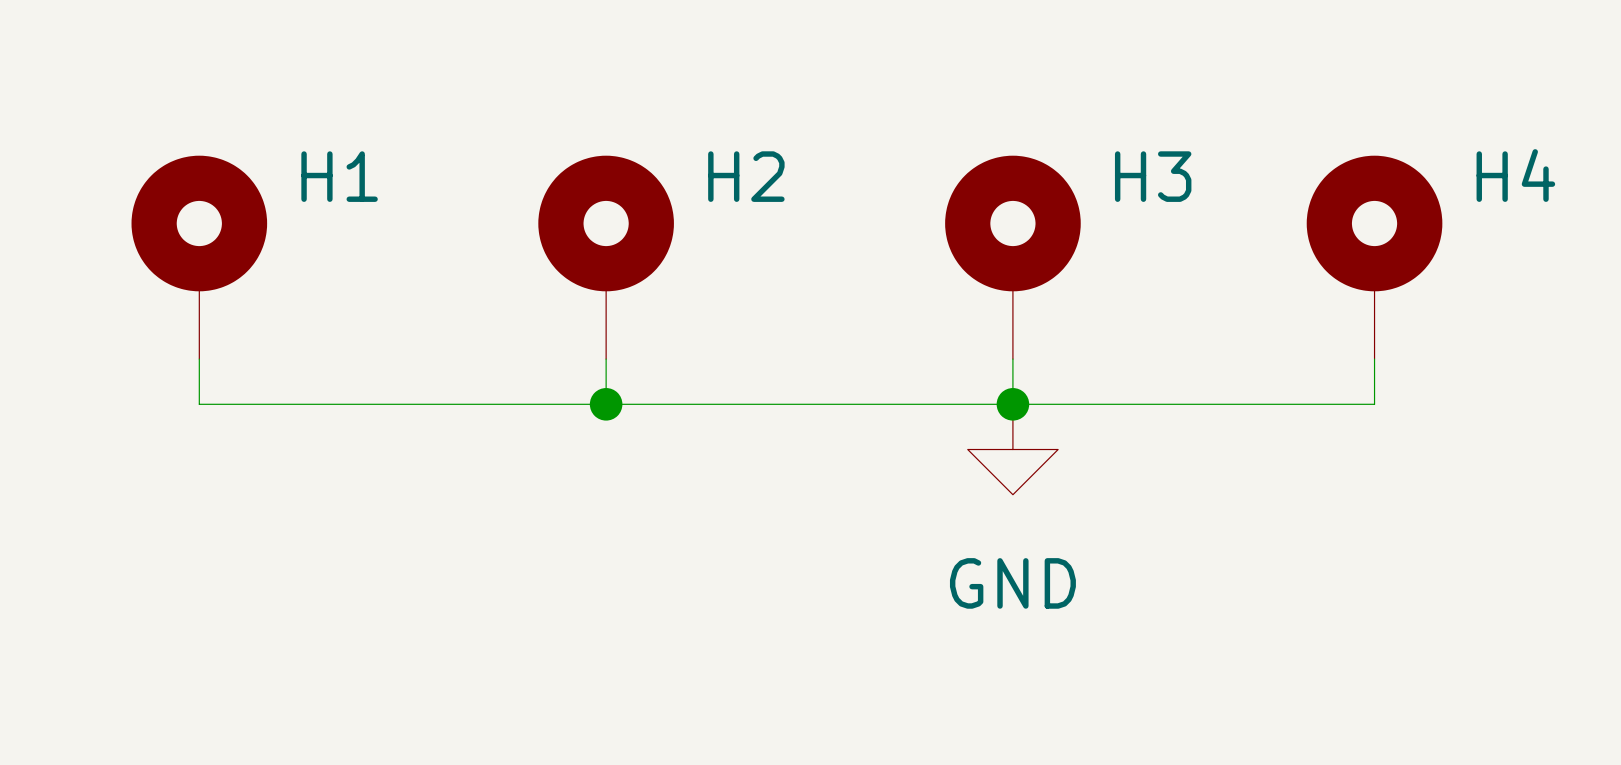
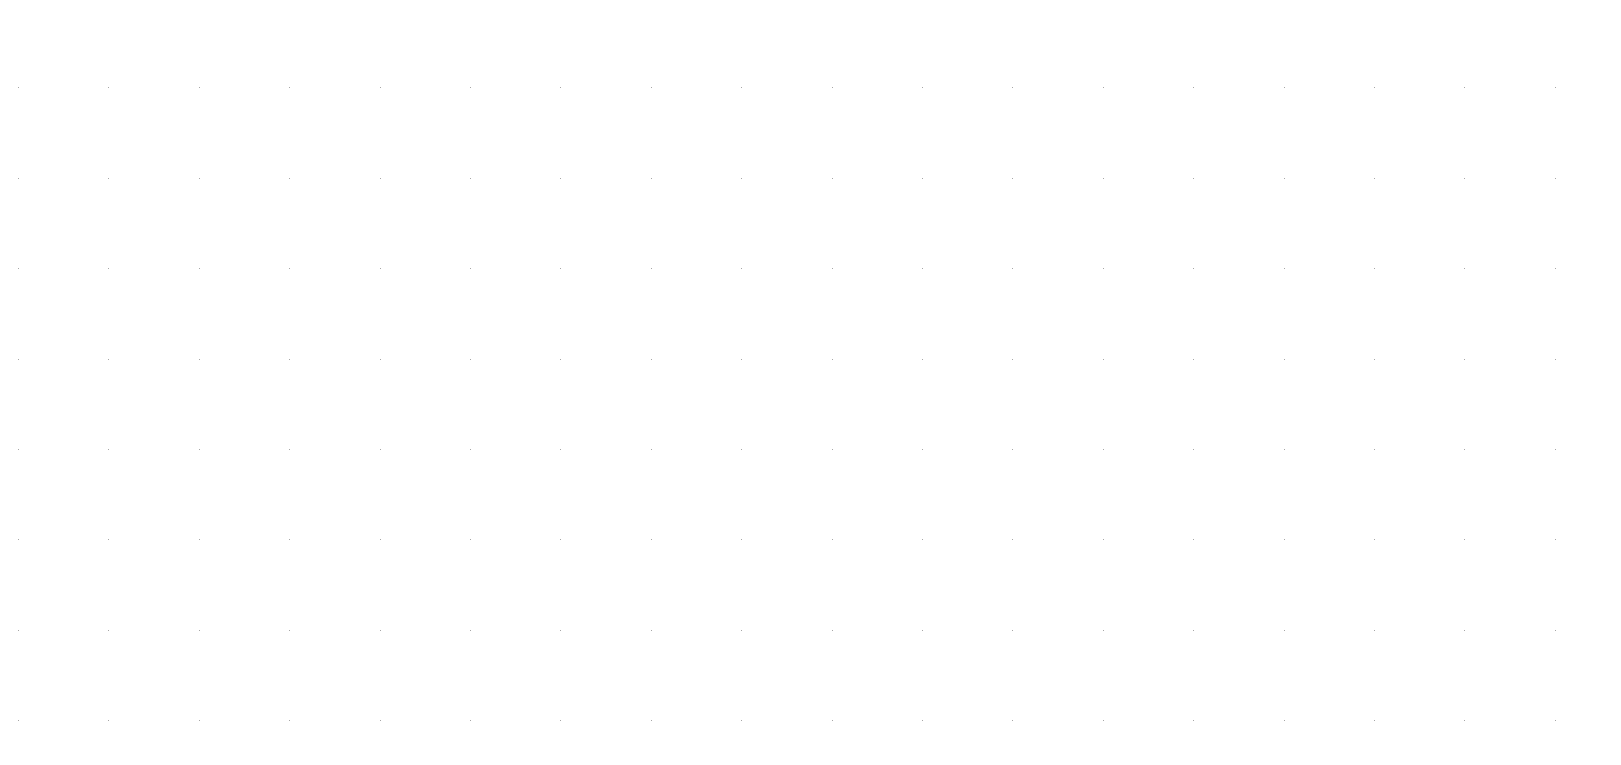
H1: (199, 257) -> none
H2: (606, 257) -> none
H3: (1012, 257) -> none
H4: (1374, 257) -> none
wire: (199, 359) (199, 404) (1374, 404) (1374, 359) -> none
wire: (606, 359) (606, 404) -> none
wire: (1012, 359) (1012, 404) -> none
junction: (606, 404) -> none
junction: (1012, 404) -> none
power symbol: GND (1012, 449) -> none

